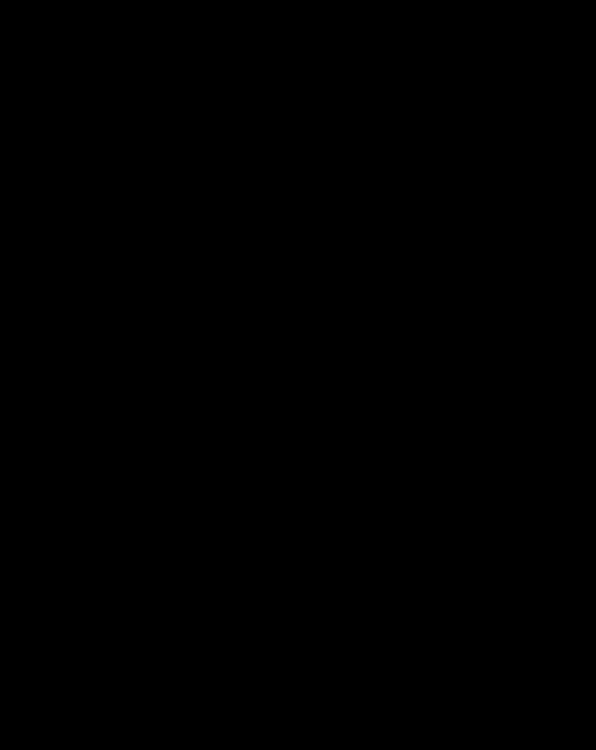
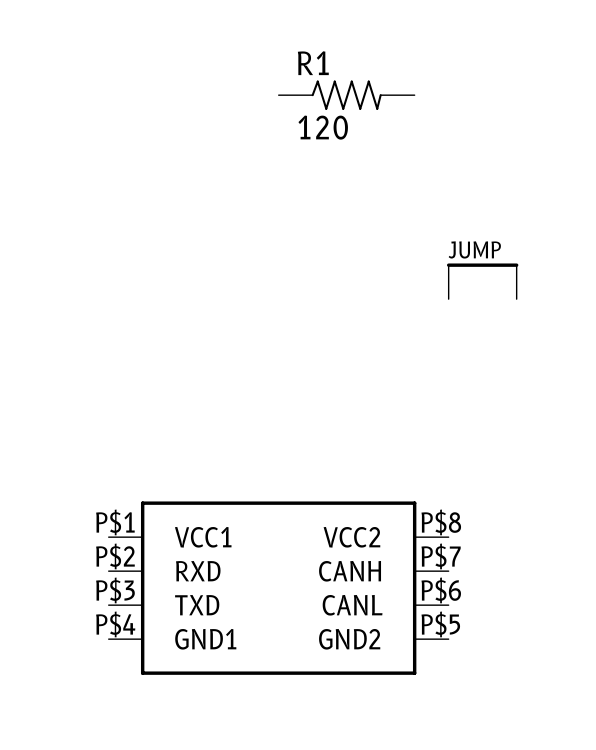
R1: none -> 120 (346, 95)
part: none -> (482, 281)
part: none -> (278, 588)

